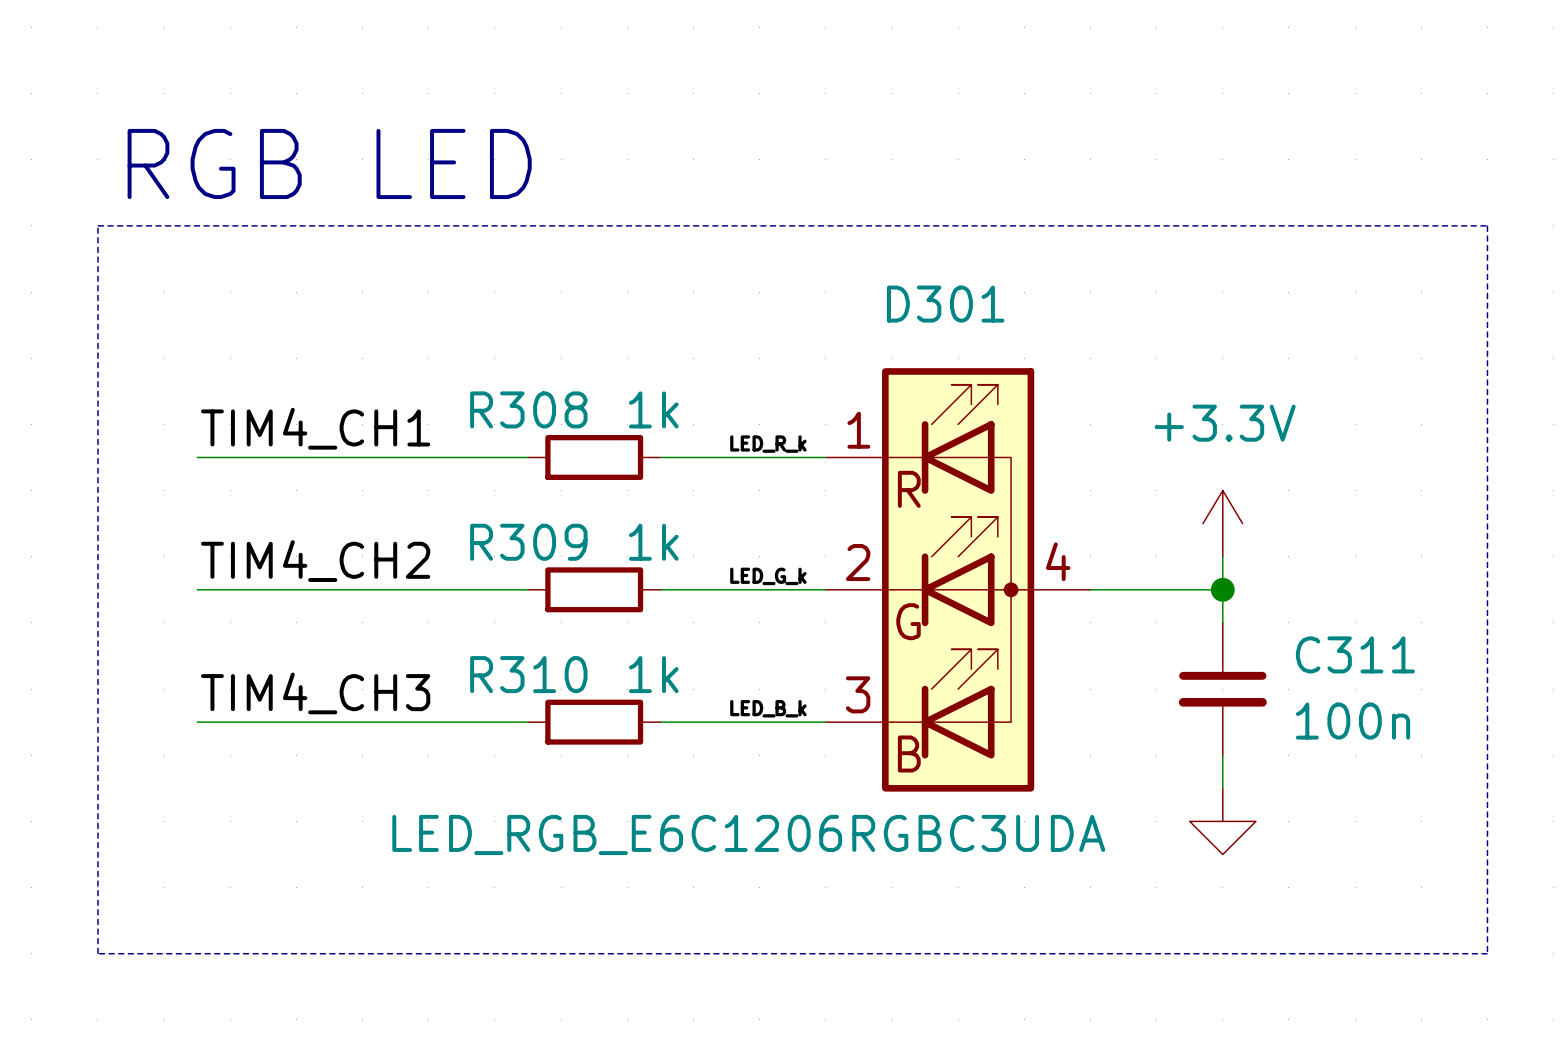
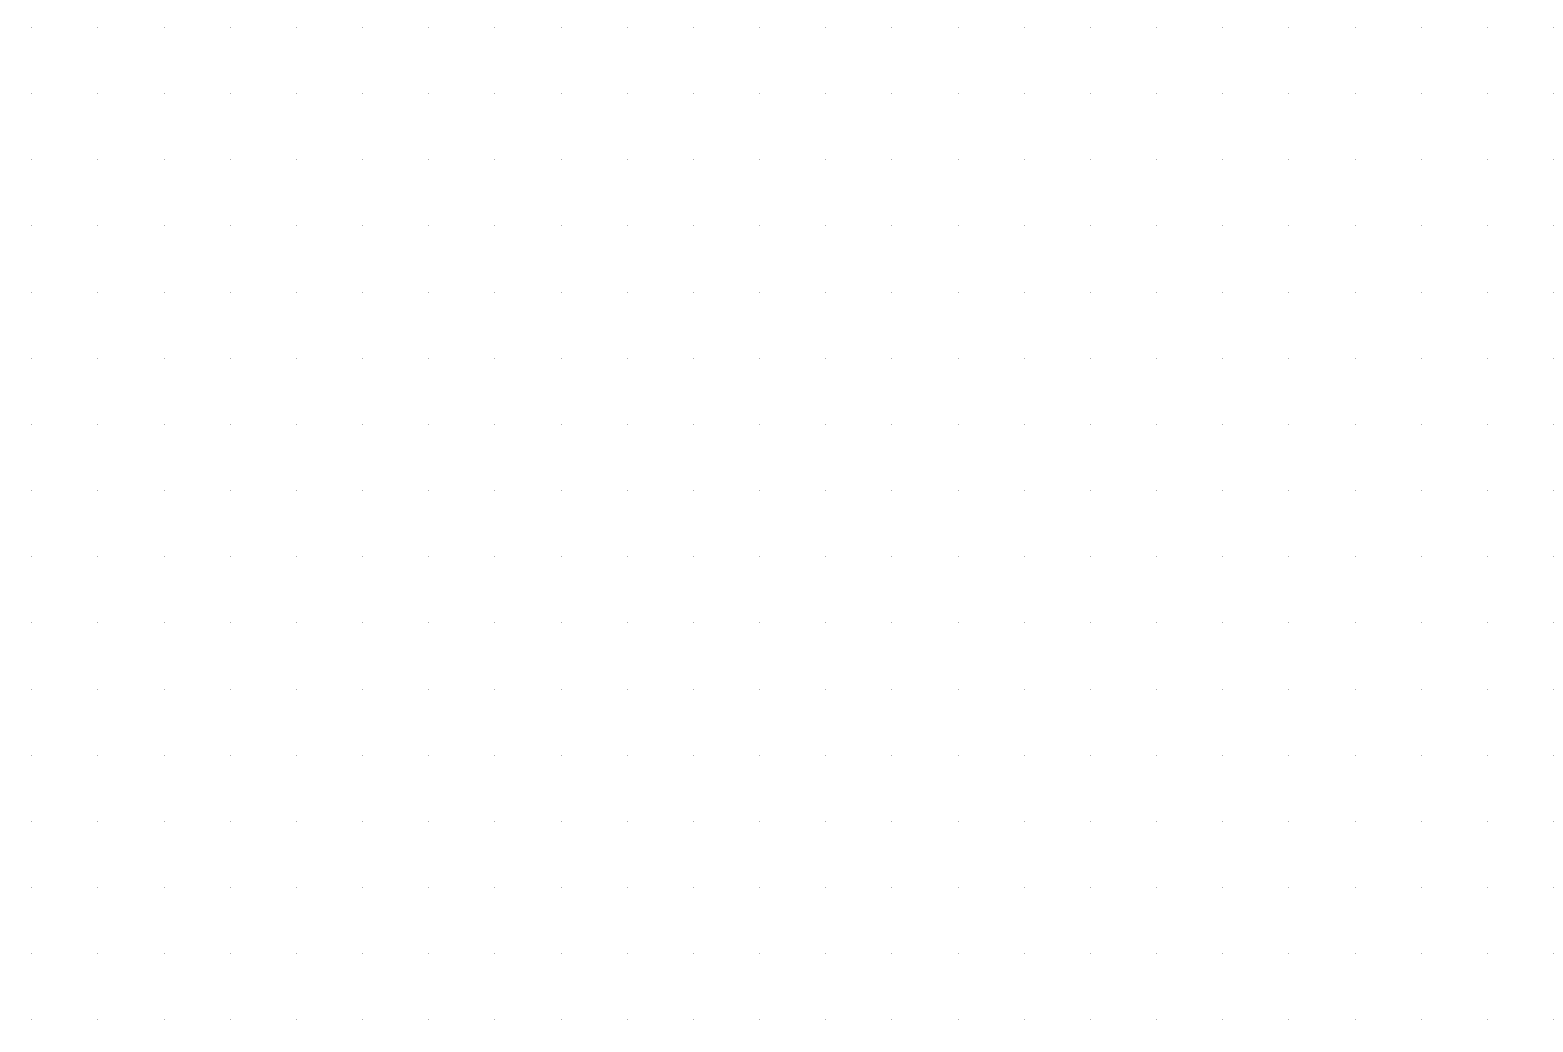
text: RGB LED (329, 163) -> none
line: (97, 225) (1487, 225) (1487, 953) (97, 953) (97, 225) -> none
label: TIM4_CH1 (315, 428) -> none
label: LED_R_k (768, 444) -> none
wire: (197, 457) (528, 457) -> none
R308: 1k (594, 457) -> none
wire: (660, 457) (825, 457) -> none
power symbol: +3.3V (1222, 523) -> none
wire: (1222, 556) (1222, 622) -> none
label: TIM4_CH2 (315, 561) -> none
label: LED_G_k (768, 576) -> none
D301: LED_RGB_E6C1206RGBC3UDA (958, 579) -> none
wire: (197, 589) (528, 589) -> none
R309: 1k (594, 589) -> none
wire: (660, 589) (825, 589) -> none
wire: (1090, 589) (1222, 589) -> none
junction: (1222, 589) -> none
C311: 100n (1222, 689) -> none
label: TIM4_CH3 (315, 693) -> none
label: LED_B_k (768, 708) -> none
wire: (197, 722) (528, 722) -> none
R310: 1k (594, 722) -> none
wire: (660, 722) (825, 722) -> none
wire: (1222, 755) (1222, 788) -> none
power symbol: (1222, 821) -> none

